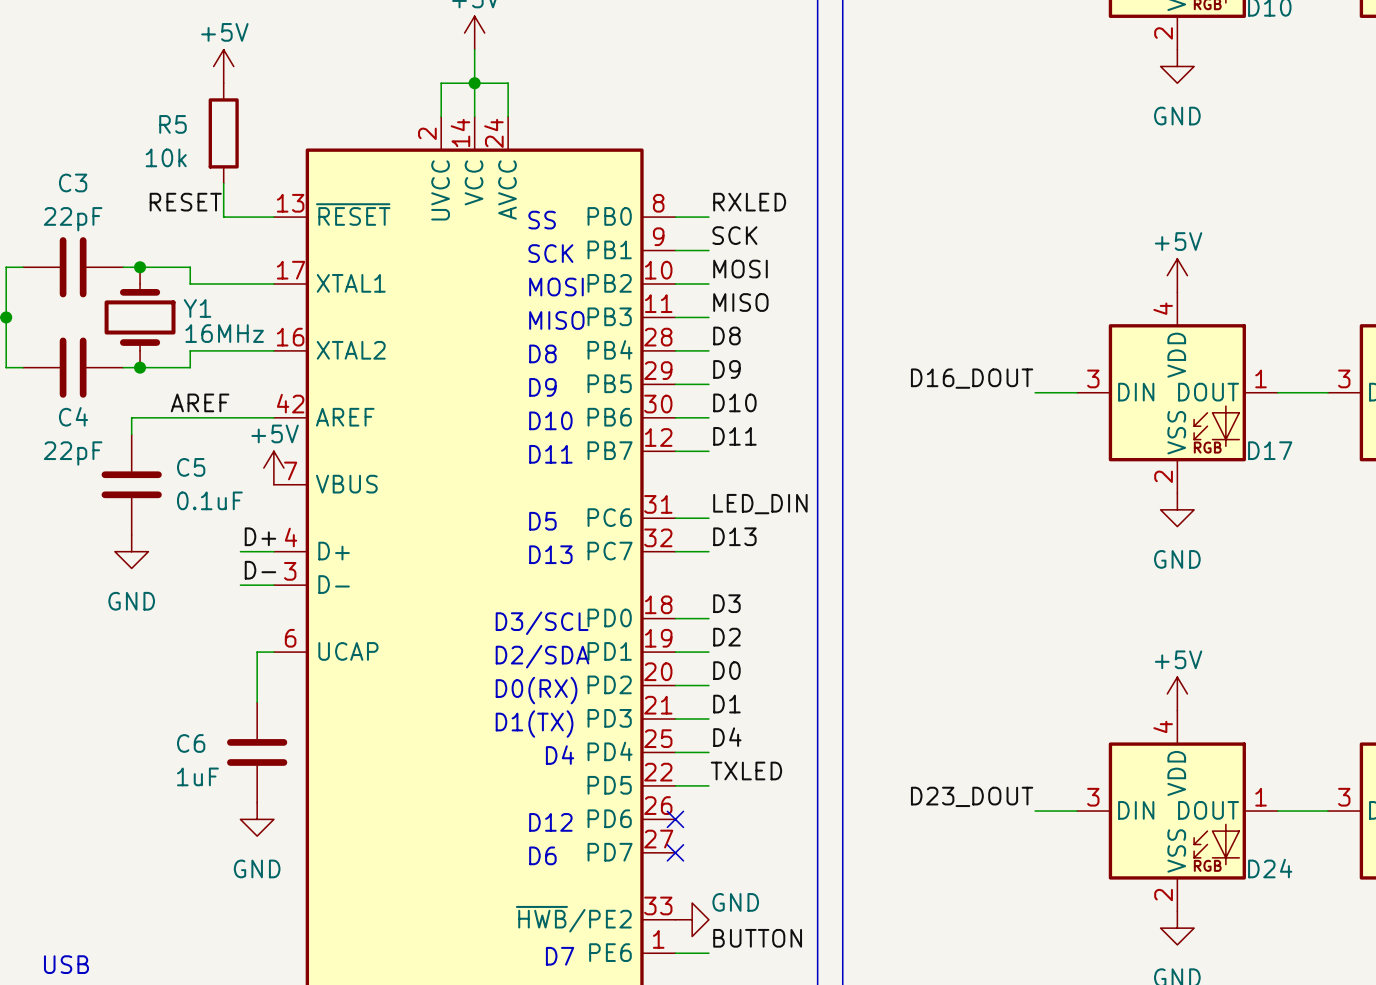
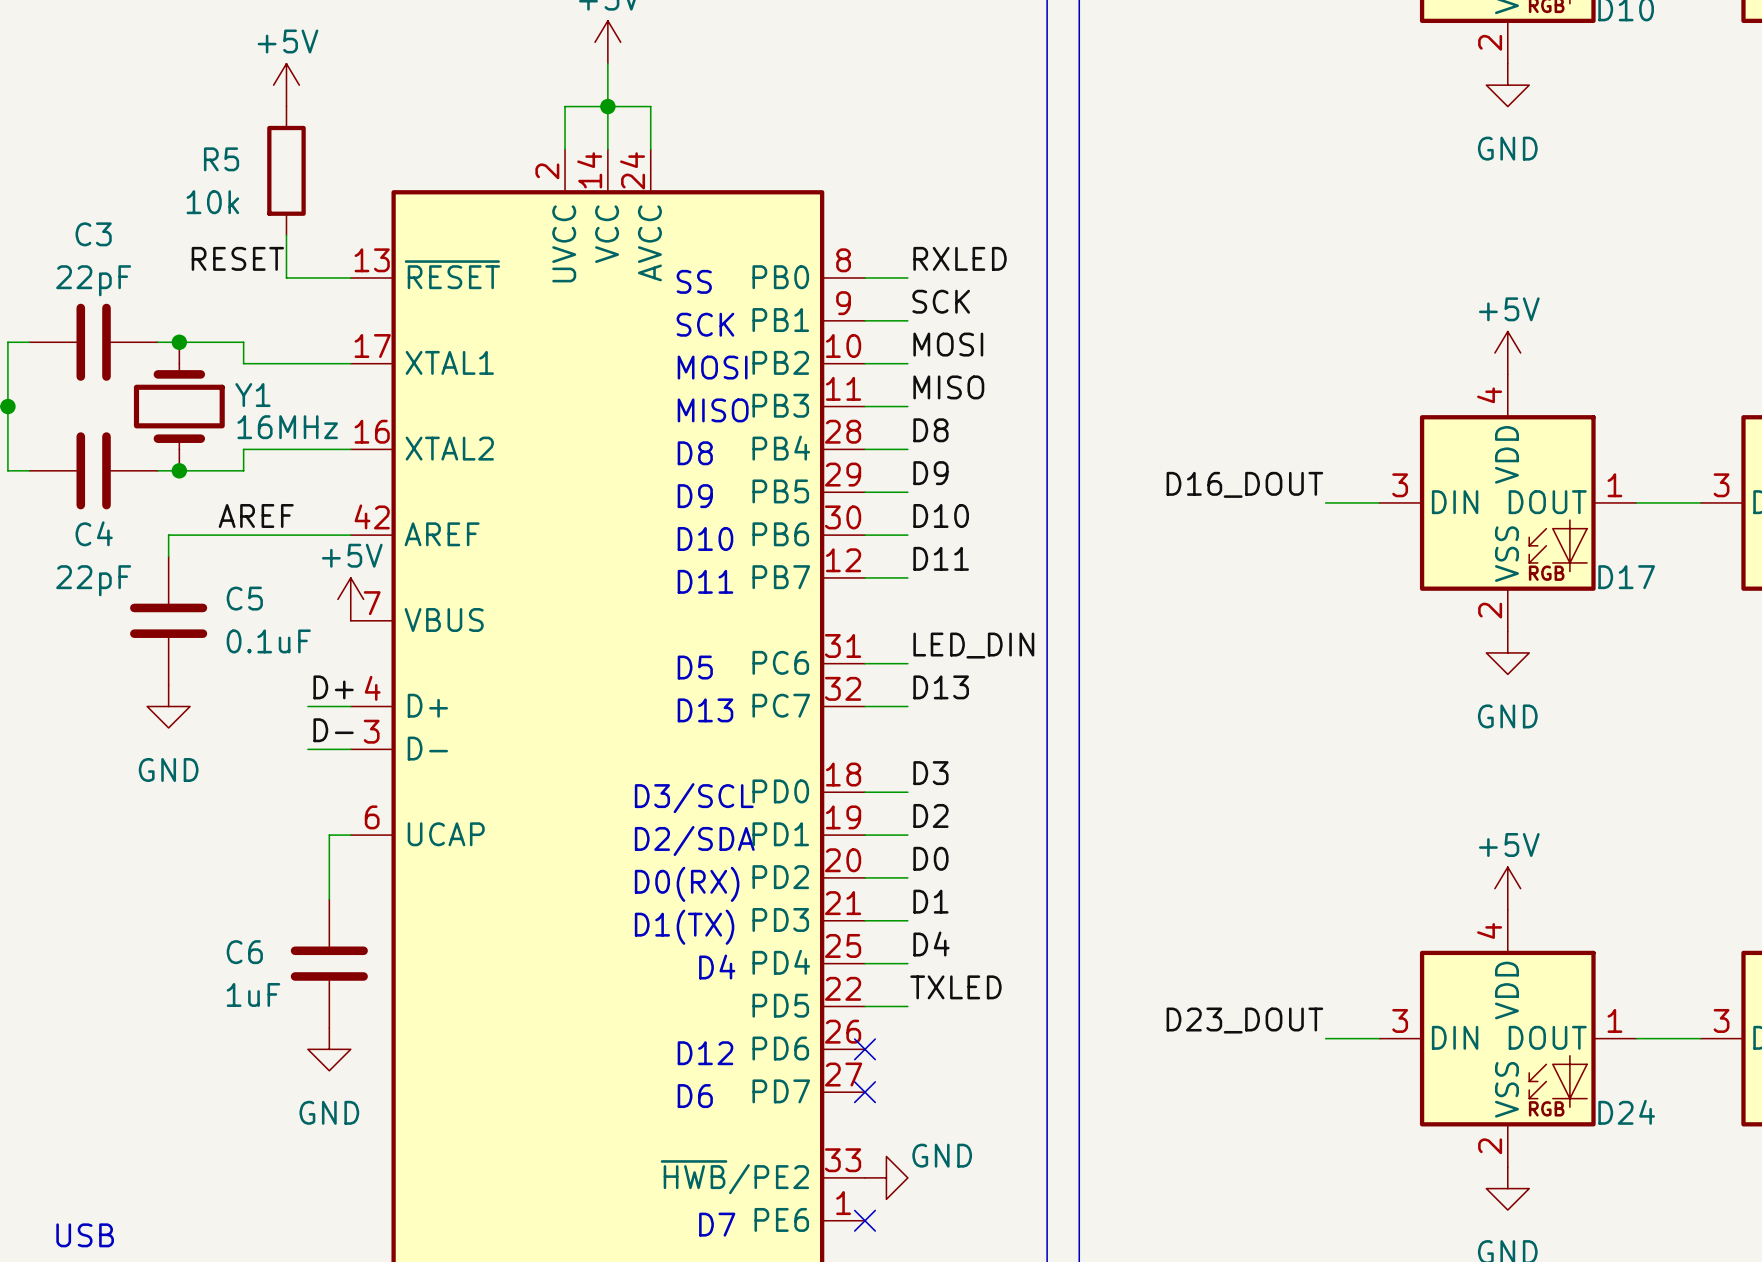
label: BUTTON (757, 938) -> none
wire: (675, 953) (708, 953) -> none
no-connect mark: none -> (864, 1220)

